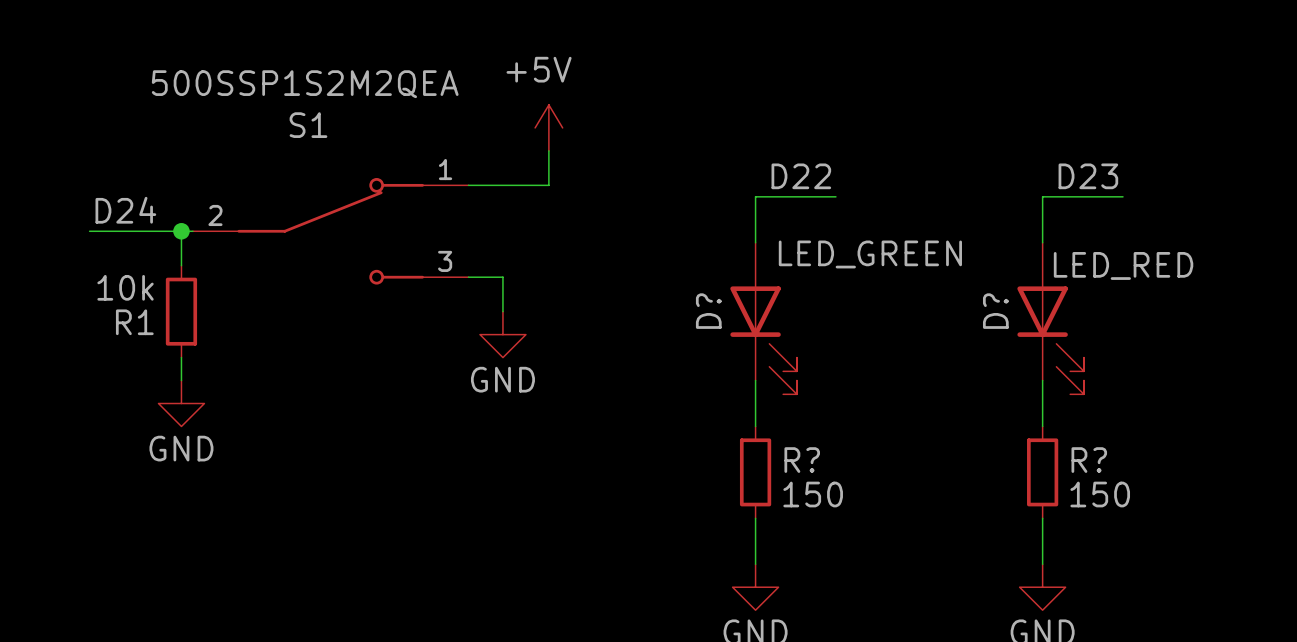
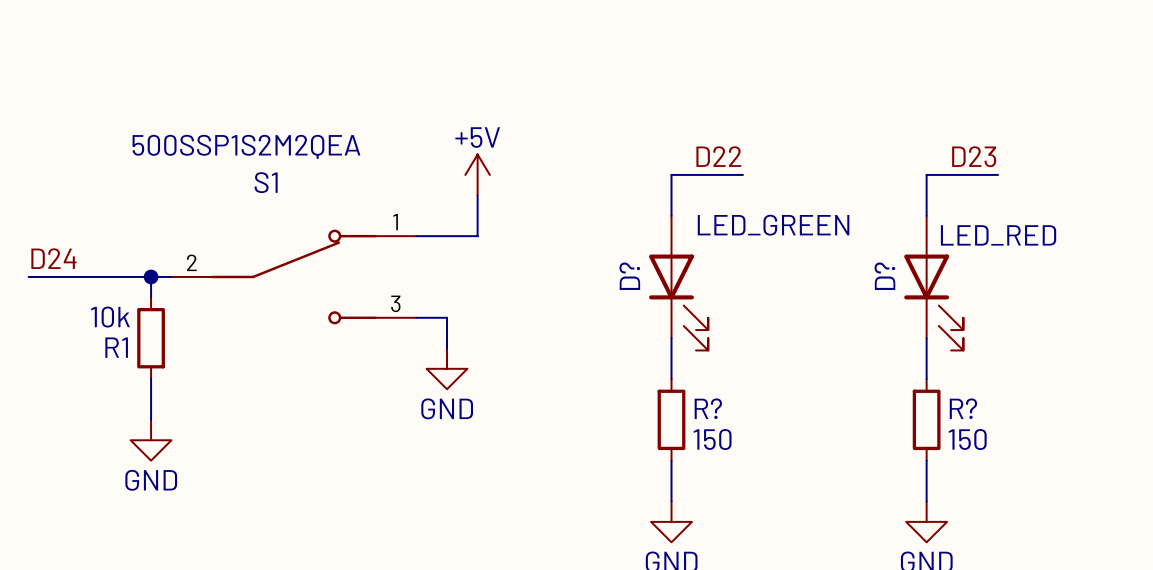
power symbol text position: +5V (539, 69) -> +5V (477, 137)
power symbol position: +5V (548, 127) -> +5V (477, 174)
wire: (548, 150) (548, 185) (468, 185) -> none
label position: D24 (125, 210) -> D24 (53, 258)
wire: none -> (477, 195) (477, 236) (416, 236)
wire: (89, 231) (192, 231) -> none
wire: (181, 231) (181, 265) -> none
junction position: (181, 231) -> (151, 276)
S1 position: (330, 231) -> (293, 276)
wire: (468, 277) (502, 277) (502, 311) -> (416, 317) (447, 317) (447, 348)
wire: none -> (28, 276) (171, 276)
R1 position: (181, 311) -> (151, 338)
power symbol position: GND (502, 334) -> GND (447, 368)
wire: (181, 357) (181, 380) -> (151, 276) (151, 297)
power symbol position: GND (181, 403) -> GND (151, 440)
wire: none -> (151, 379) (151, 419)

